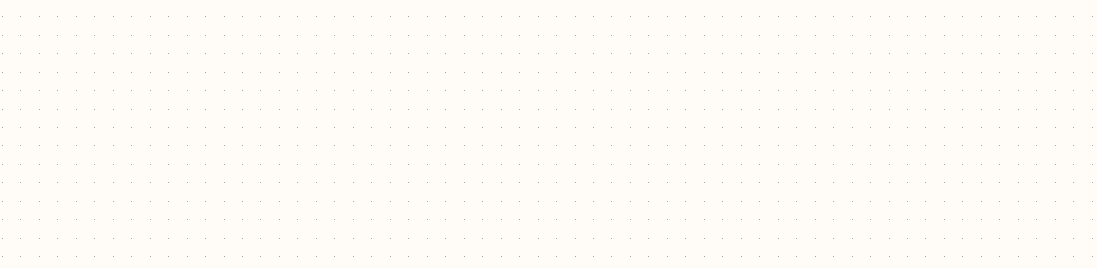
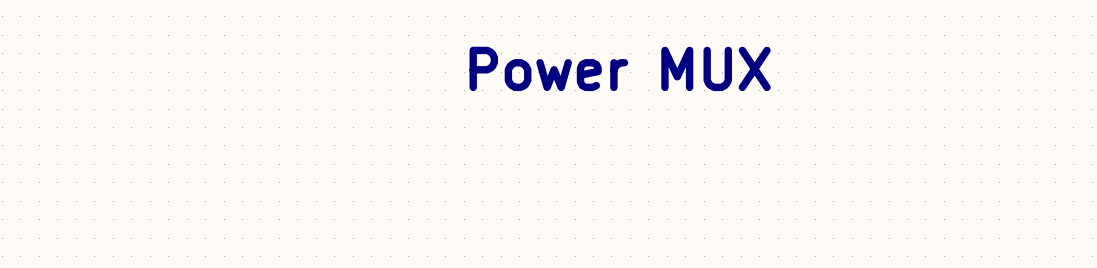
text: none -> Power MUX (620, 68)

